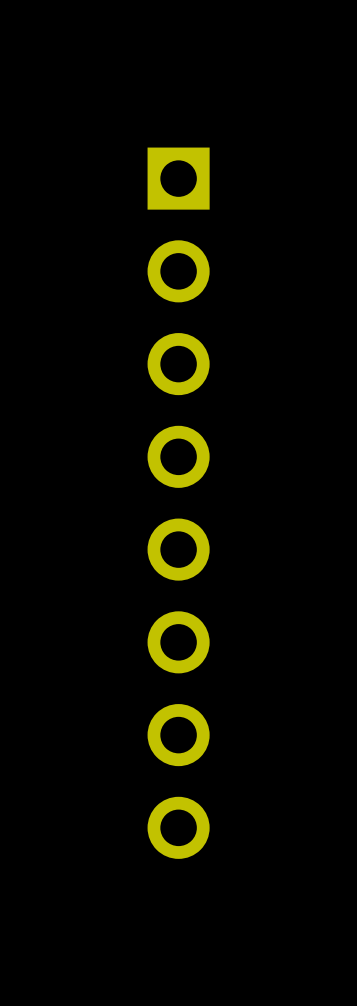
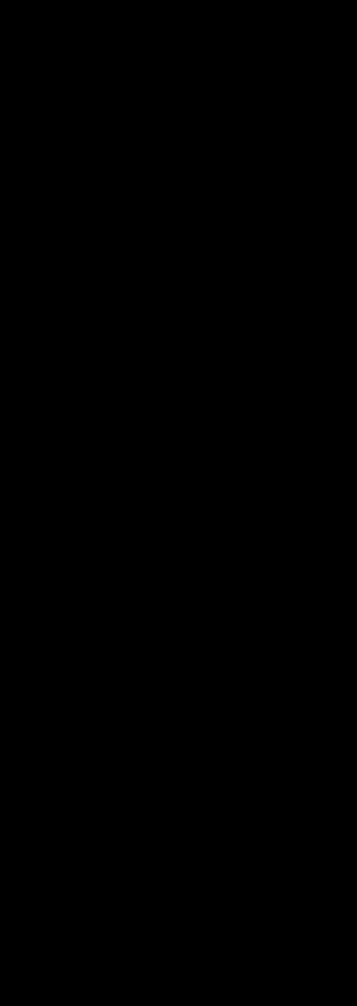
part: (178, 503) -> none

